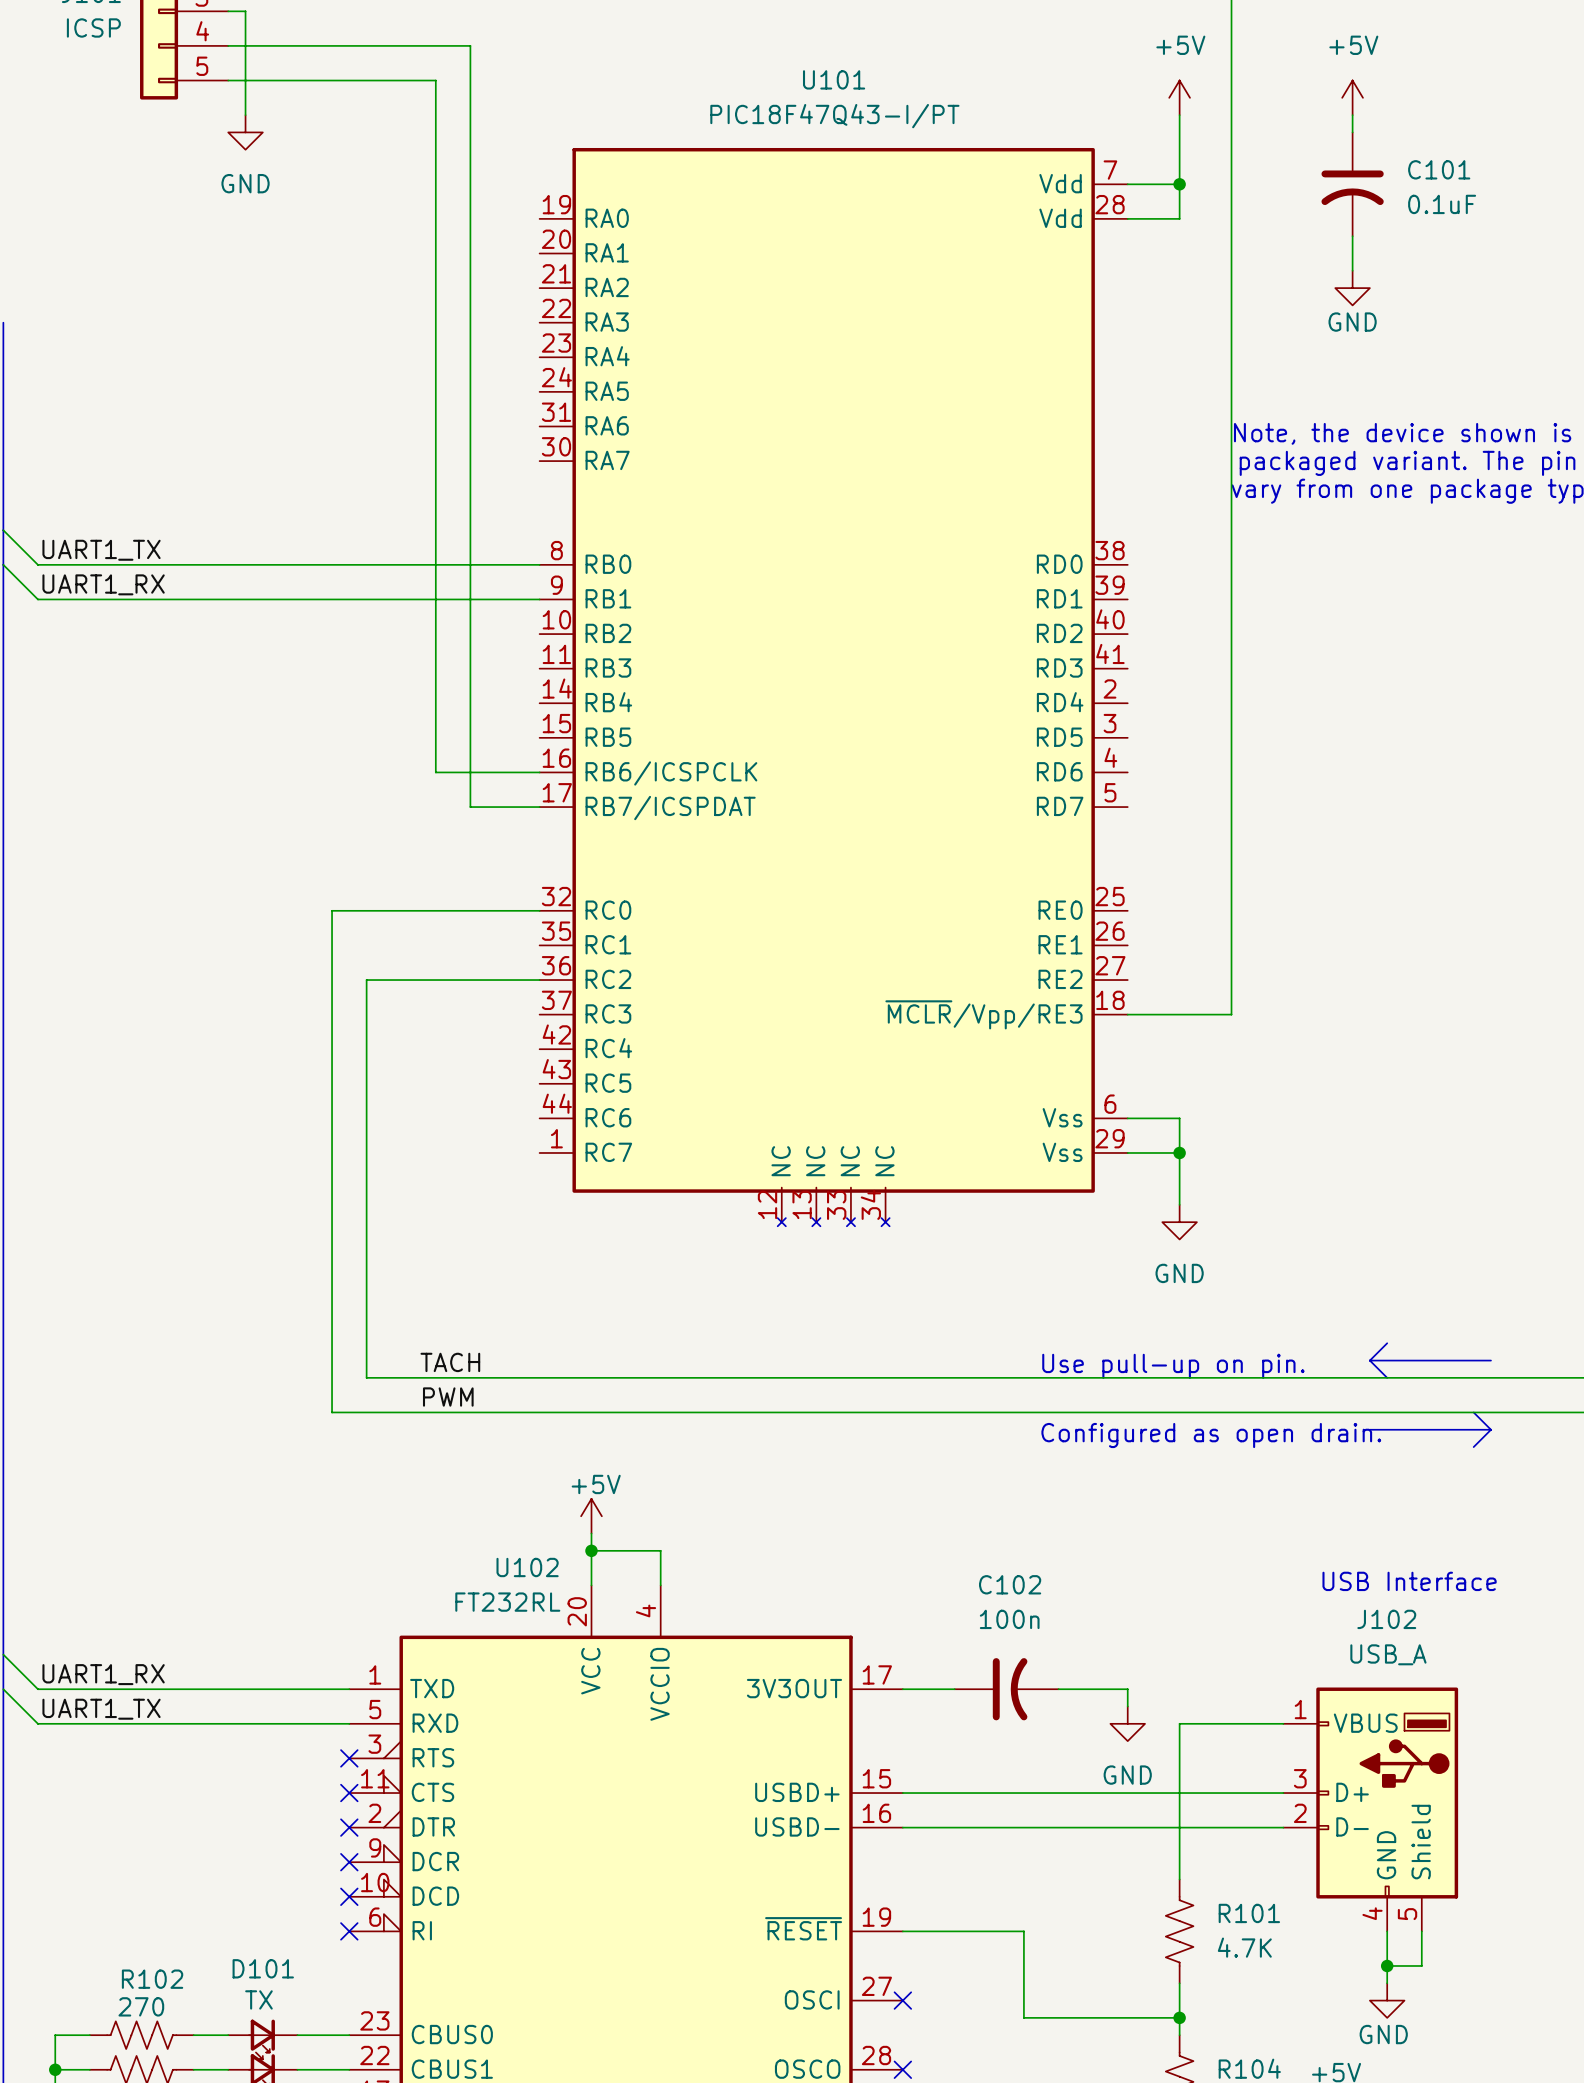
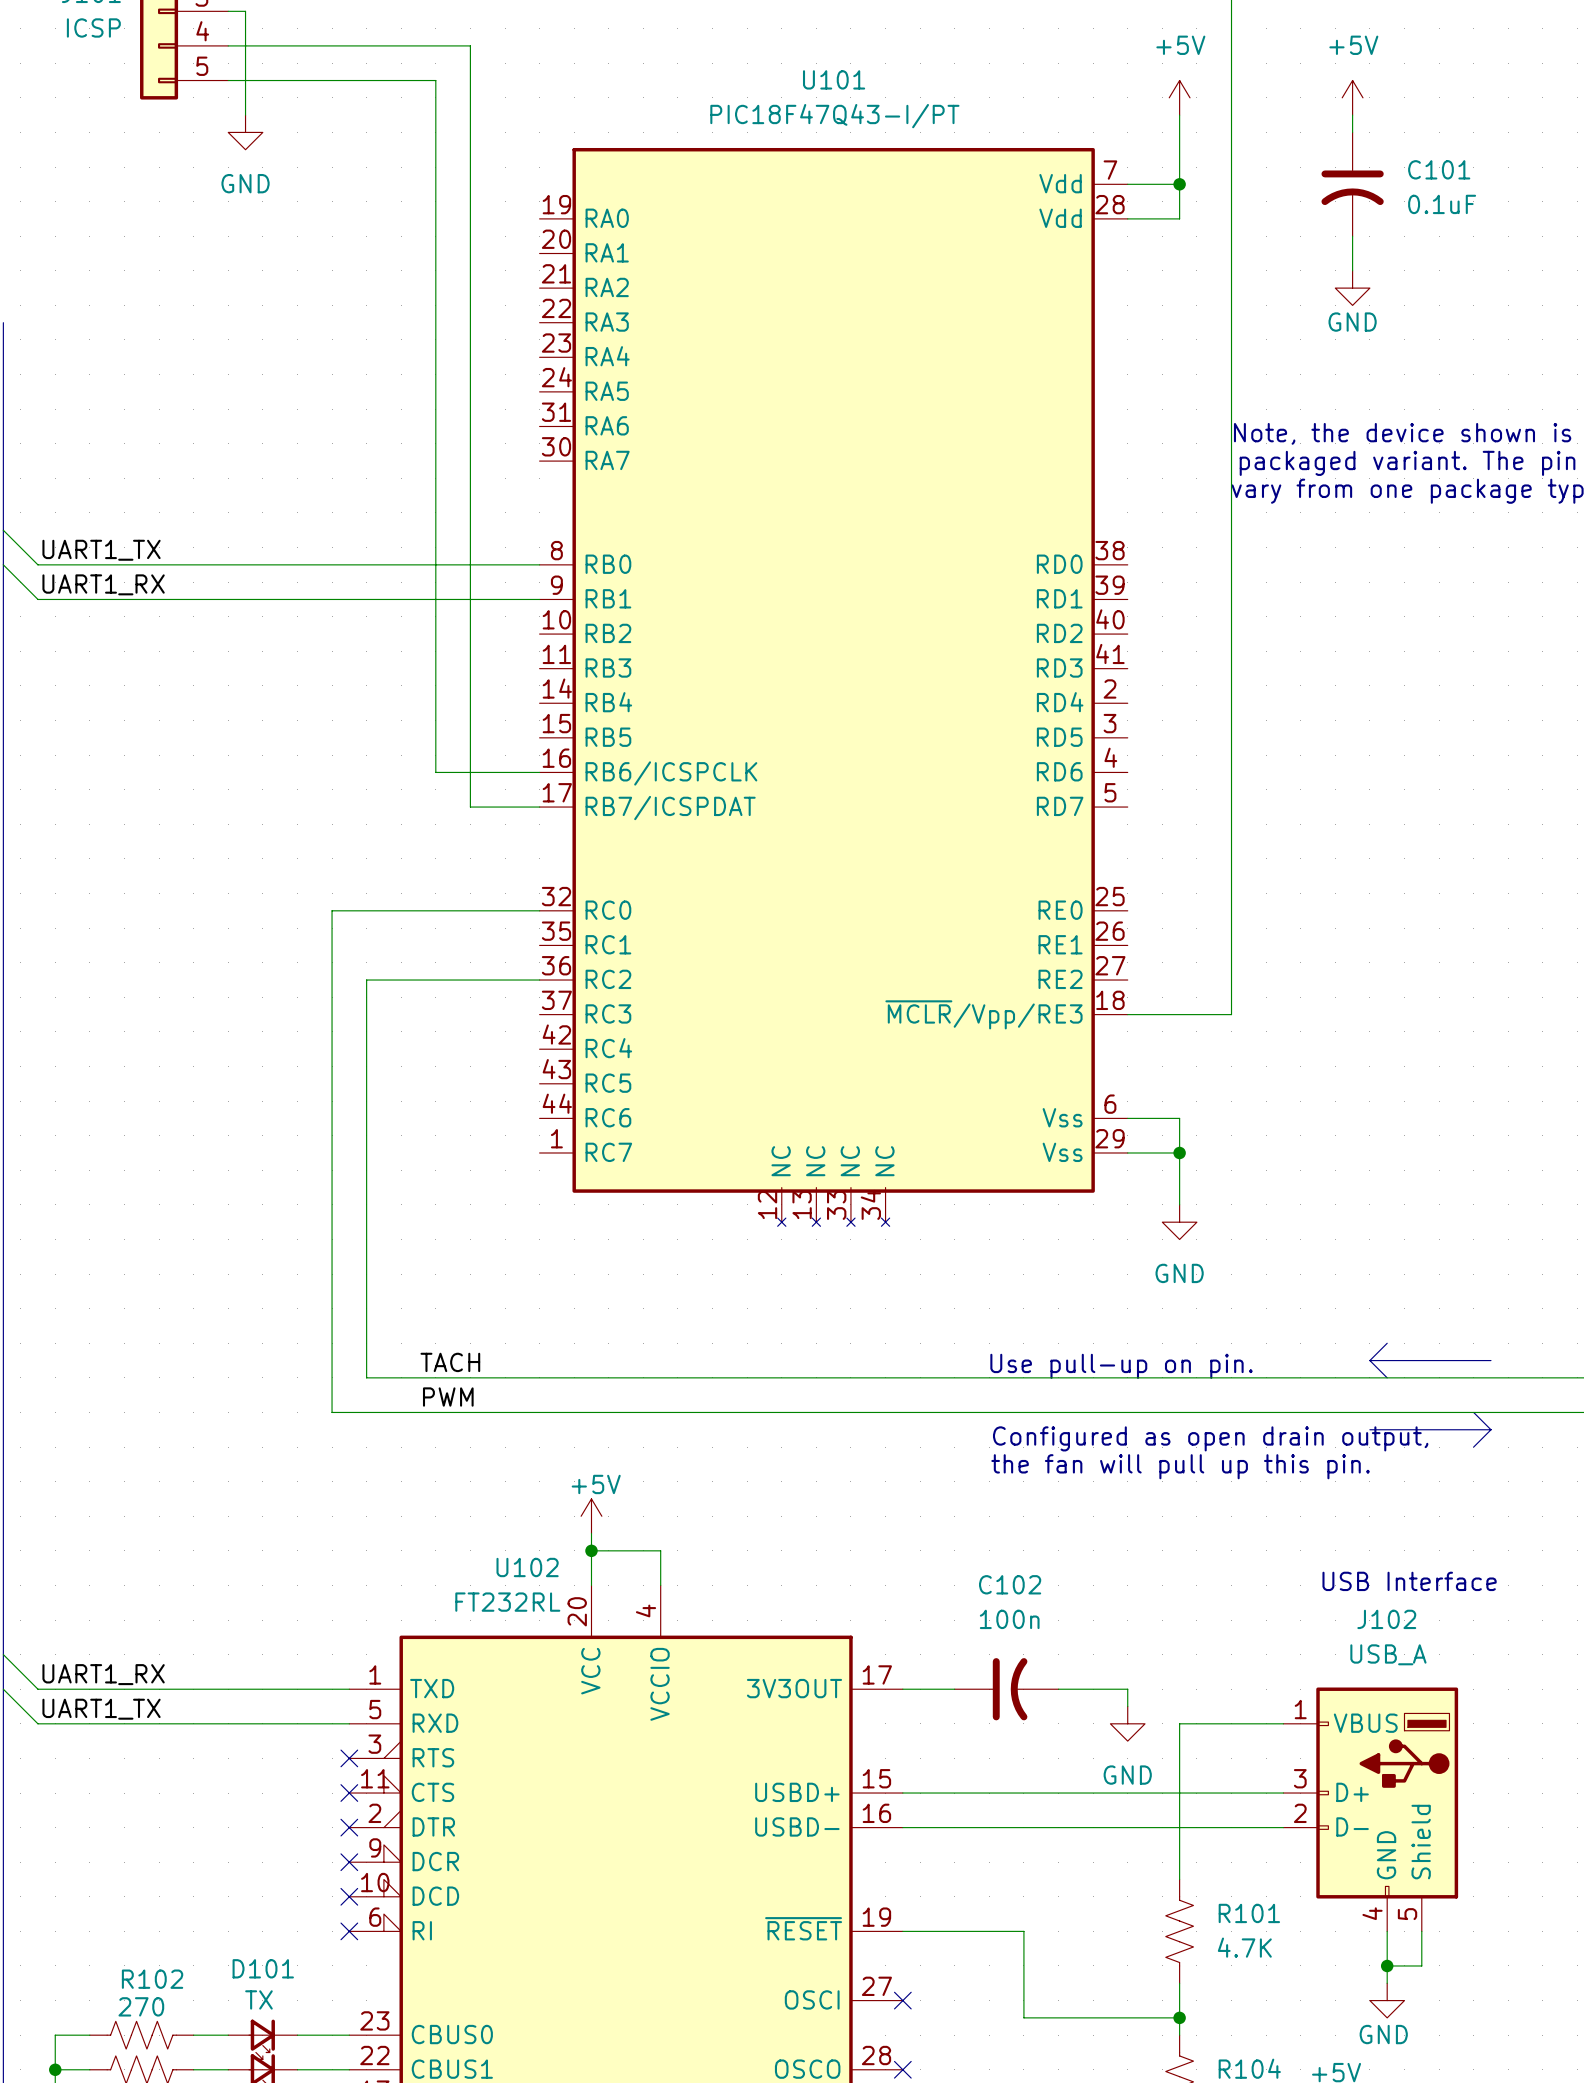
text position: Use pull-up on pin. (1173, 1366) -> Use pull-up on pin. (1121, 1366)
text: Configured as open drain. (1211, 1435) -> Configured as open drain output, (1210, 1438)
text: none -> the fan will pull up this pin. (1180, 1466)

